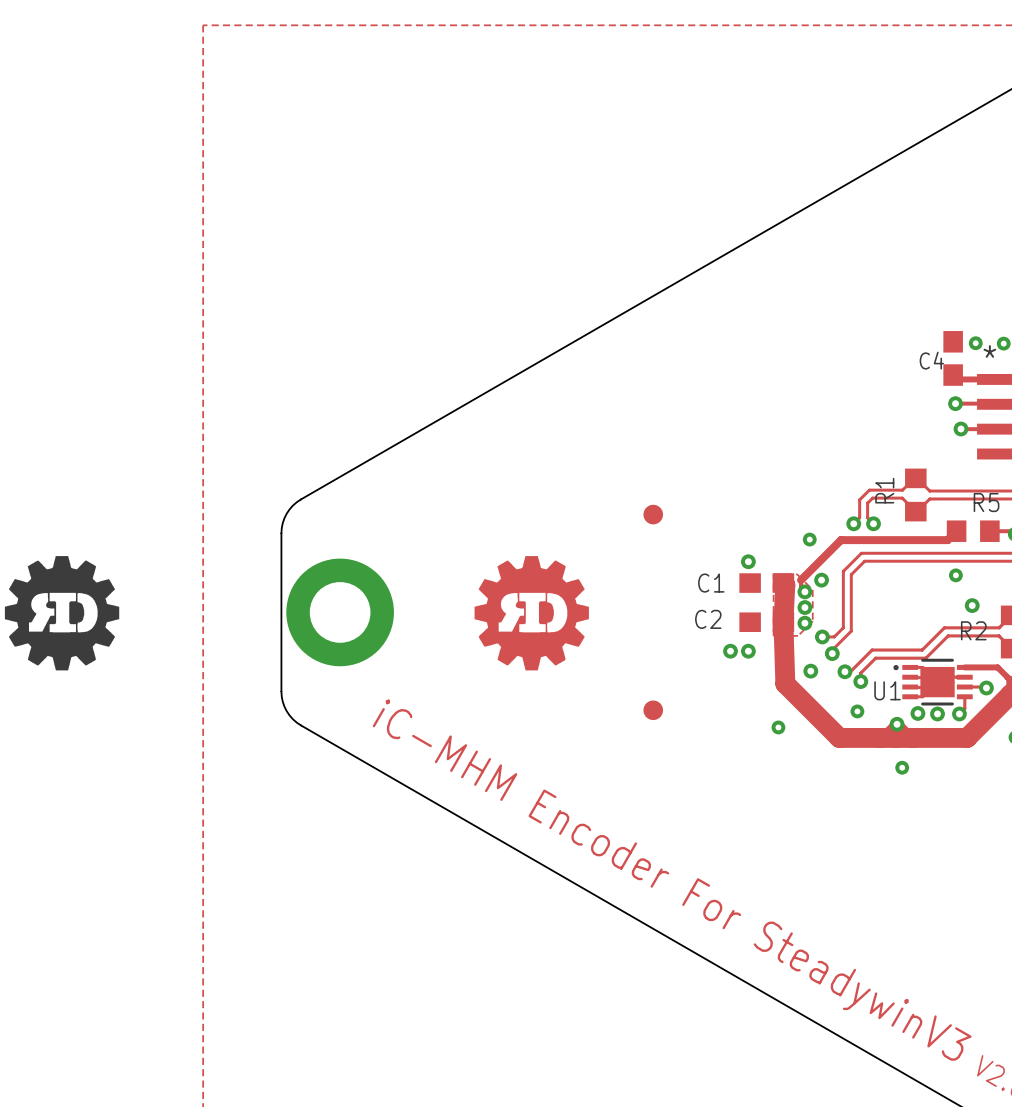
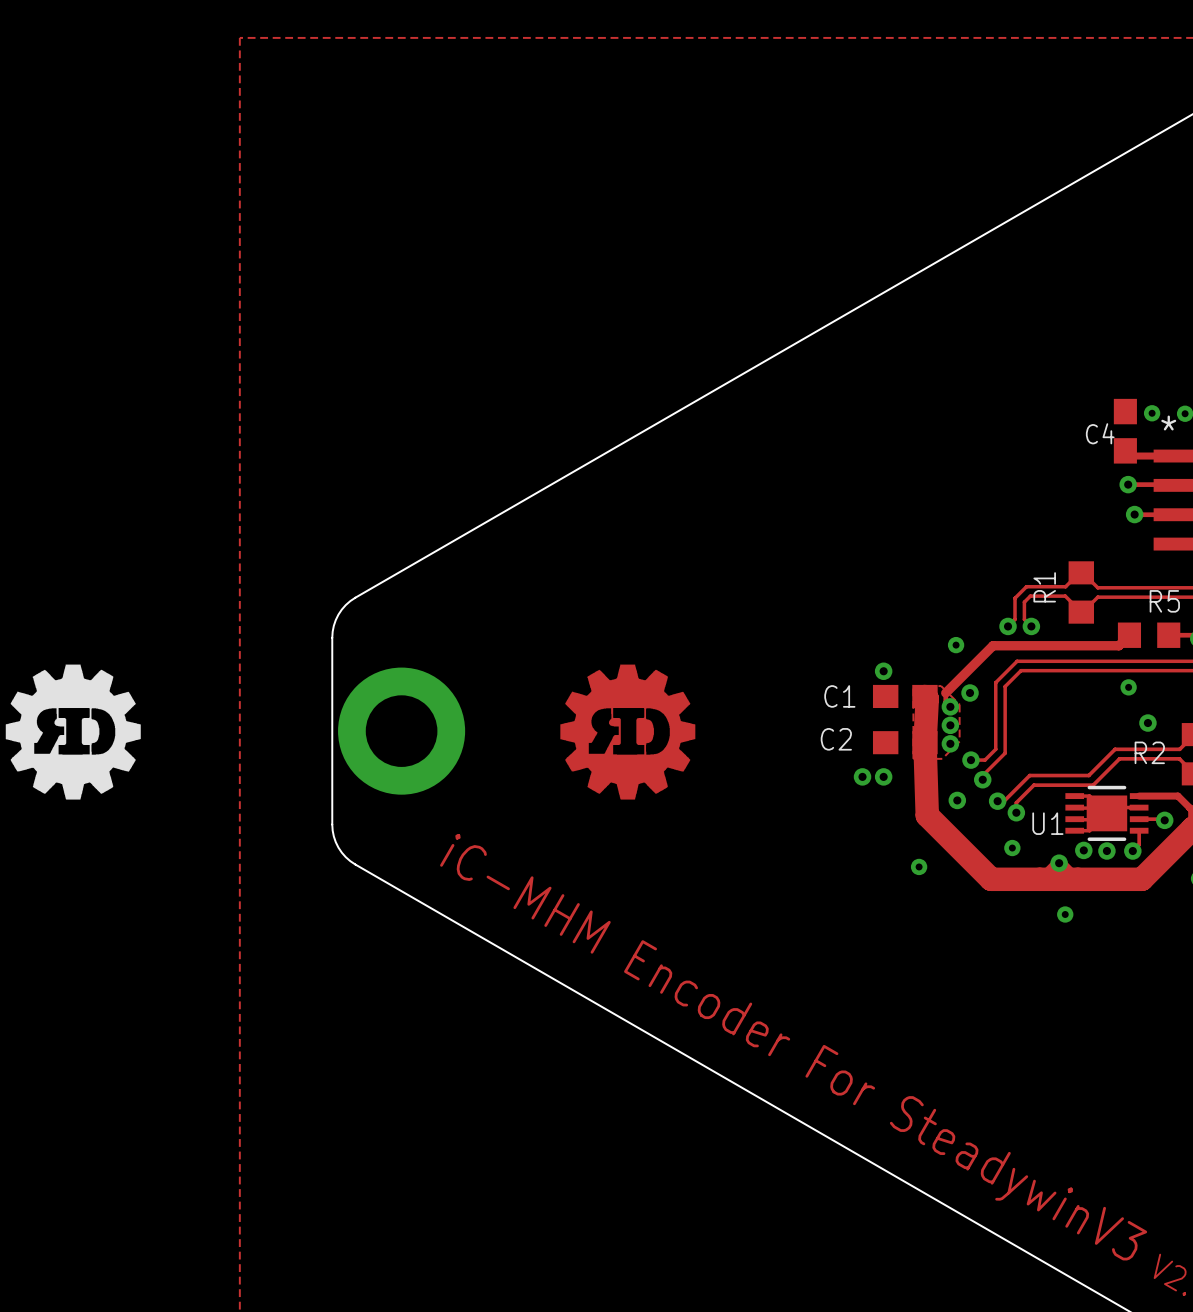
part: (653, 514) -> none
drawing: [893, 665, 899, 671] -> none
part: (653, 710) -> none

